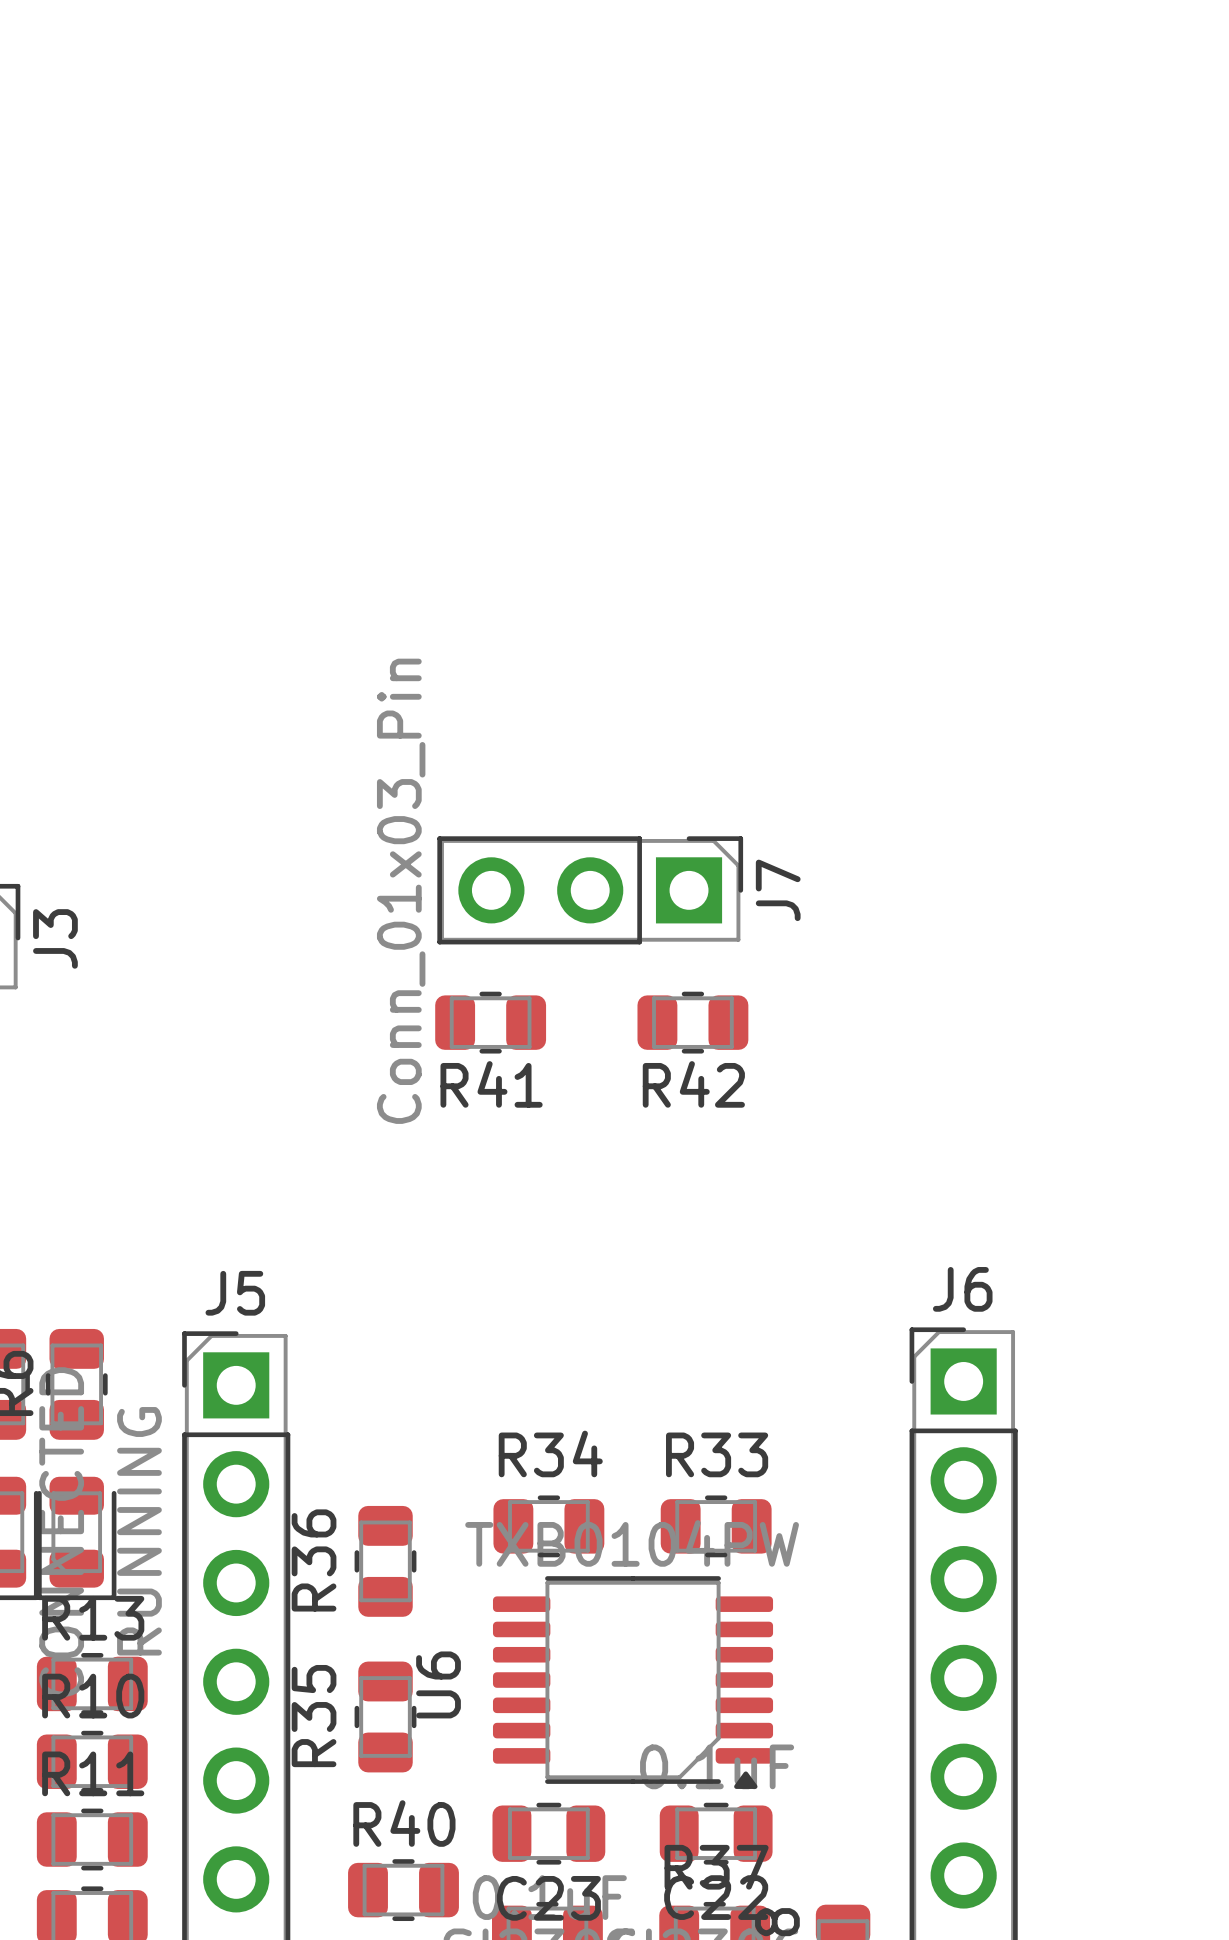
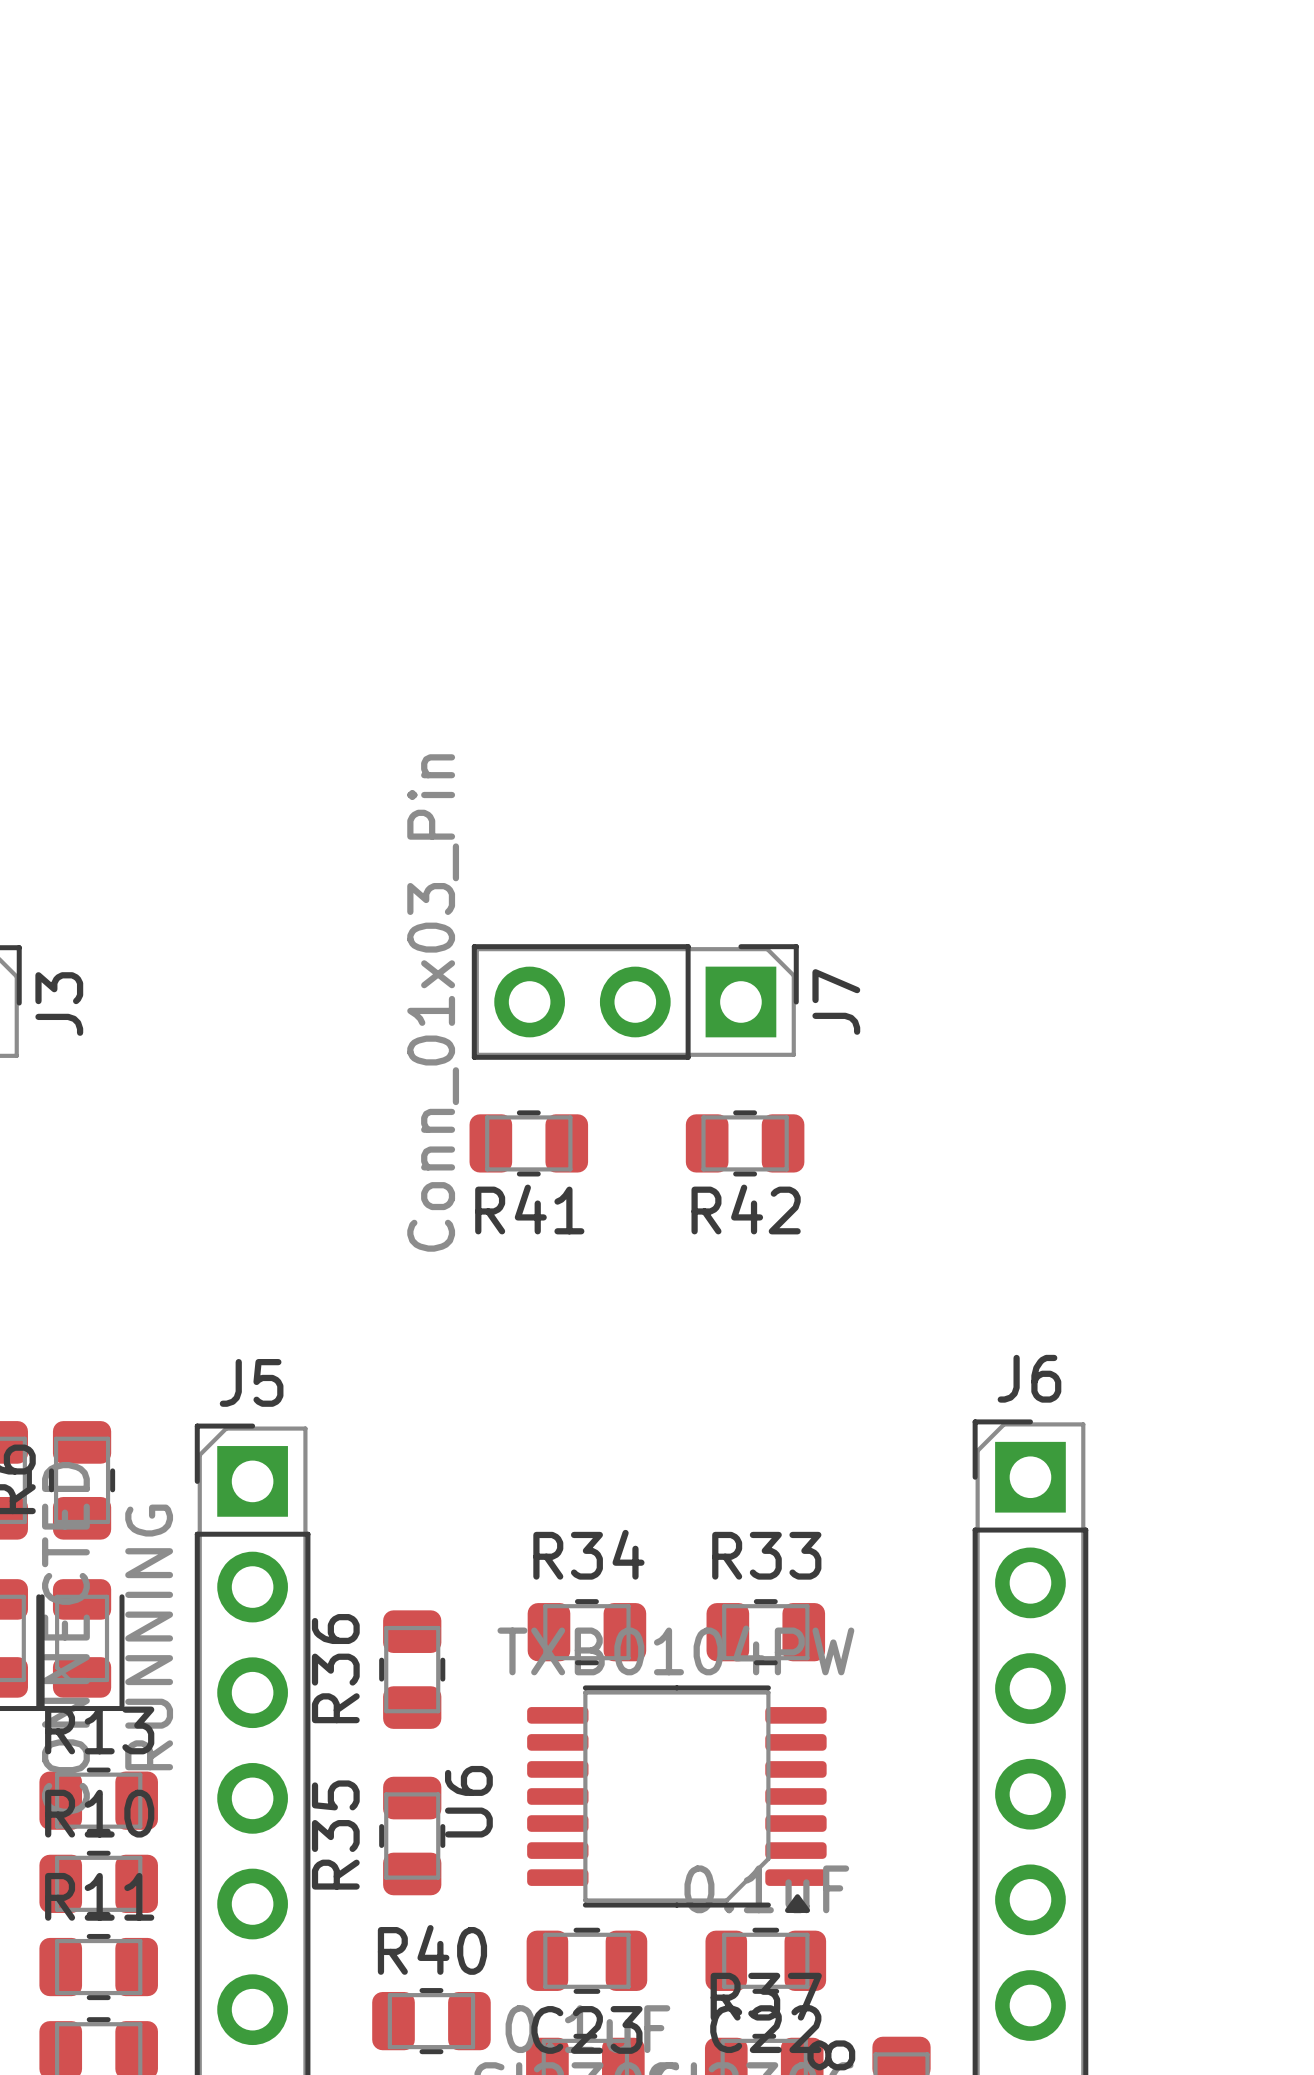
J7 position: (590, 890) -> (635, 1001)
R41 position: (490, 1022) -> (528, 1143)
R42 position: (692, 1022) -> (745, 1143)

